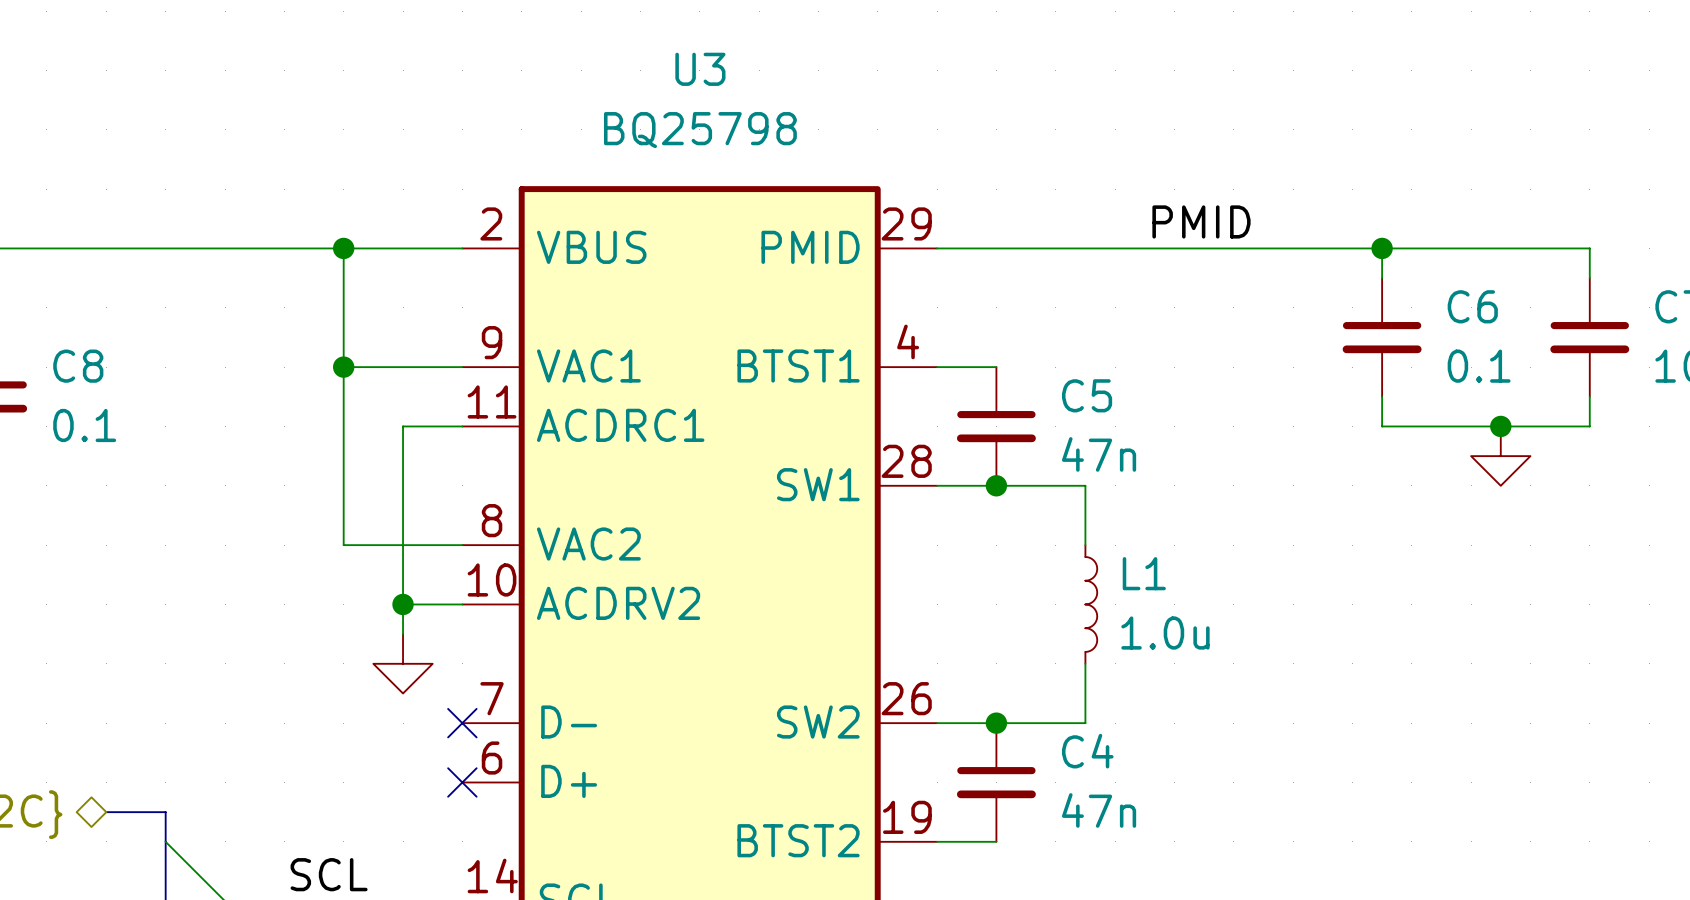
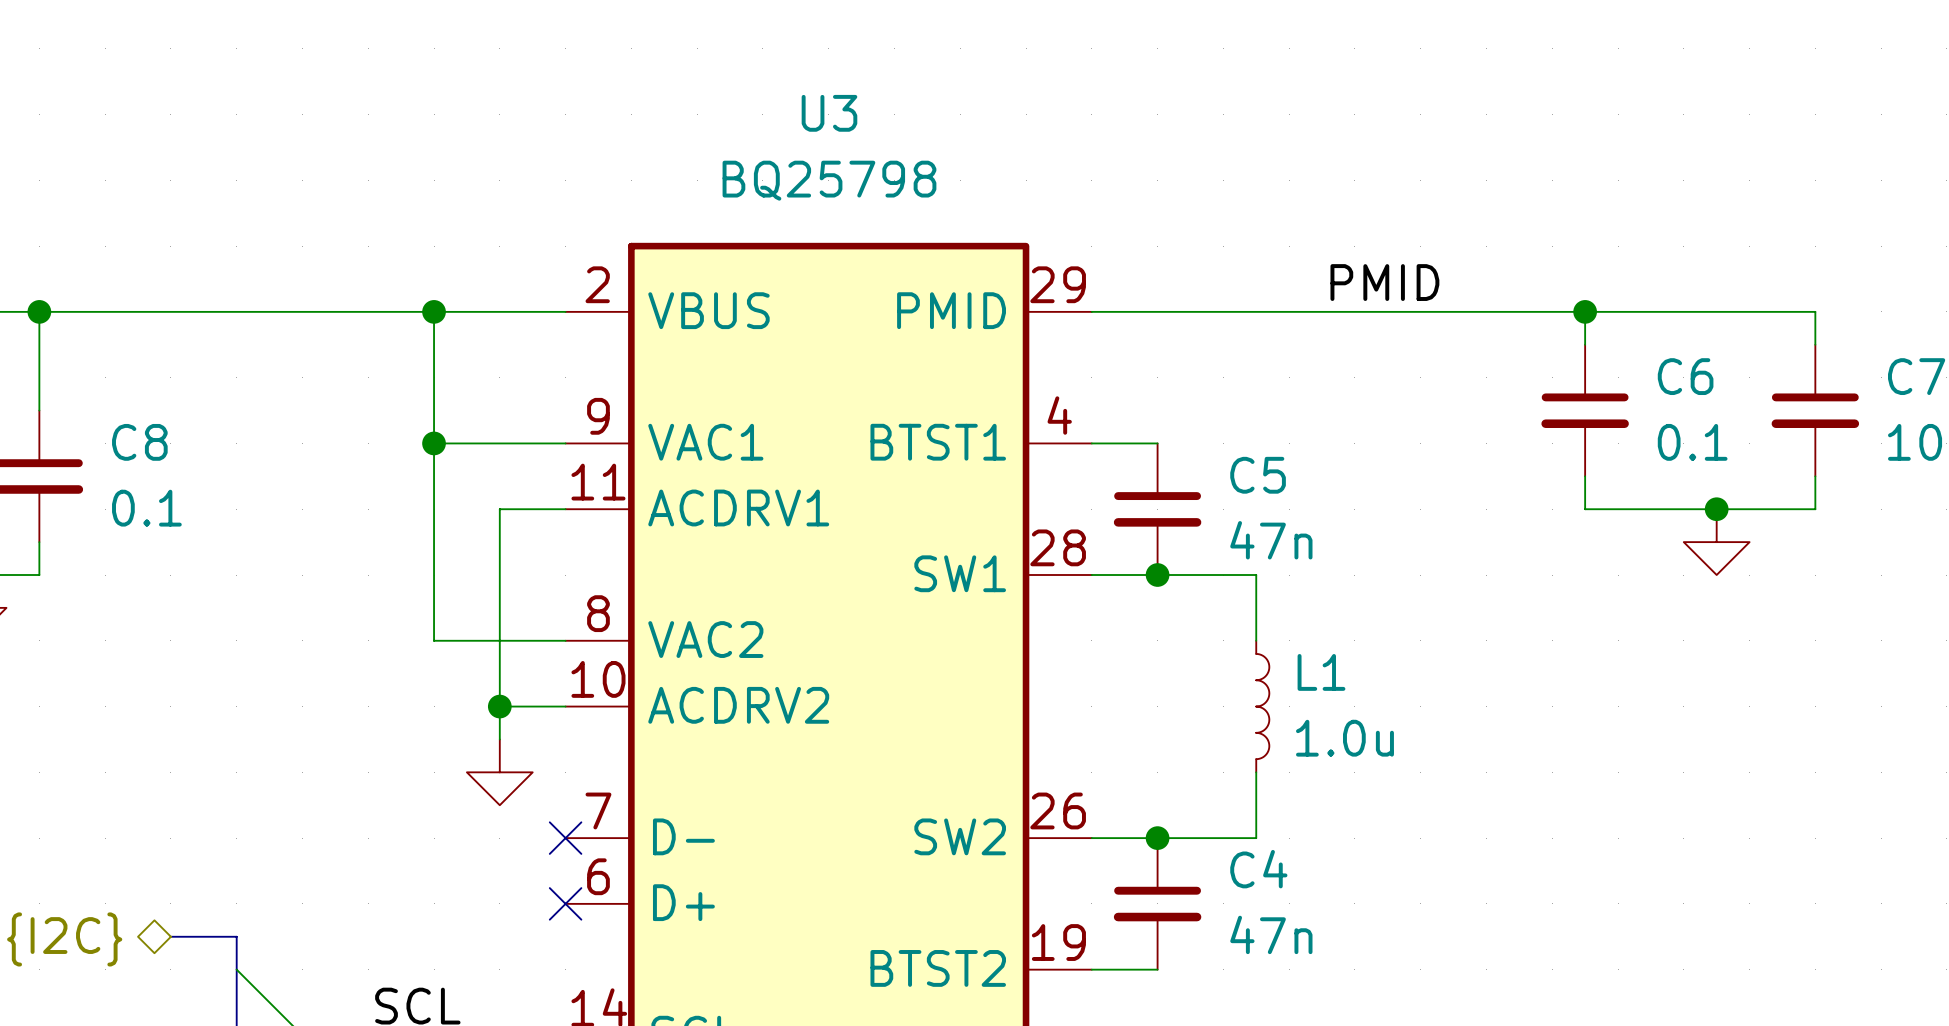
U3 pin name: ACDRC1 (620, 425) -> ACDRV1 (738, 507)

